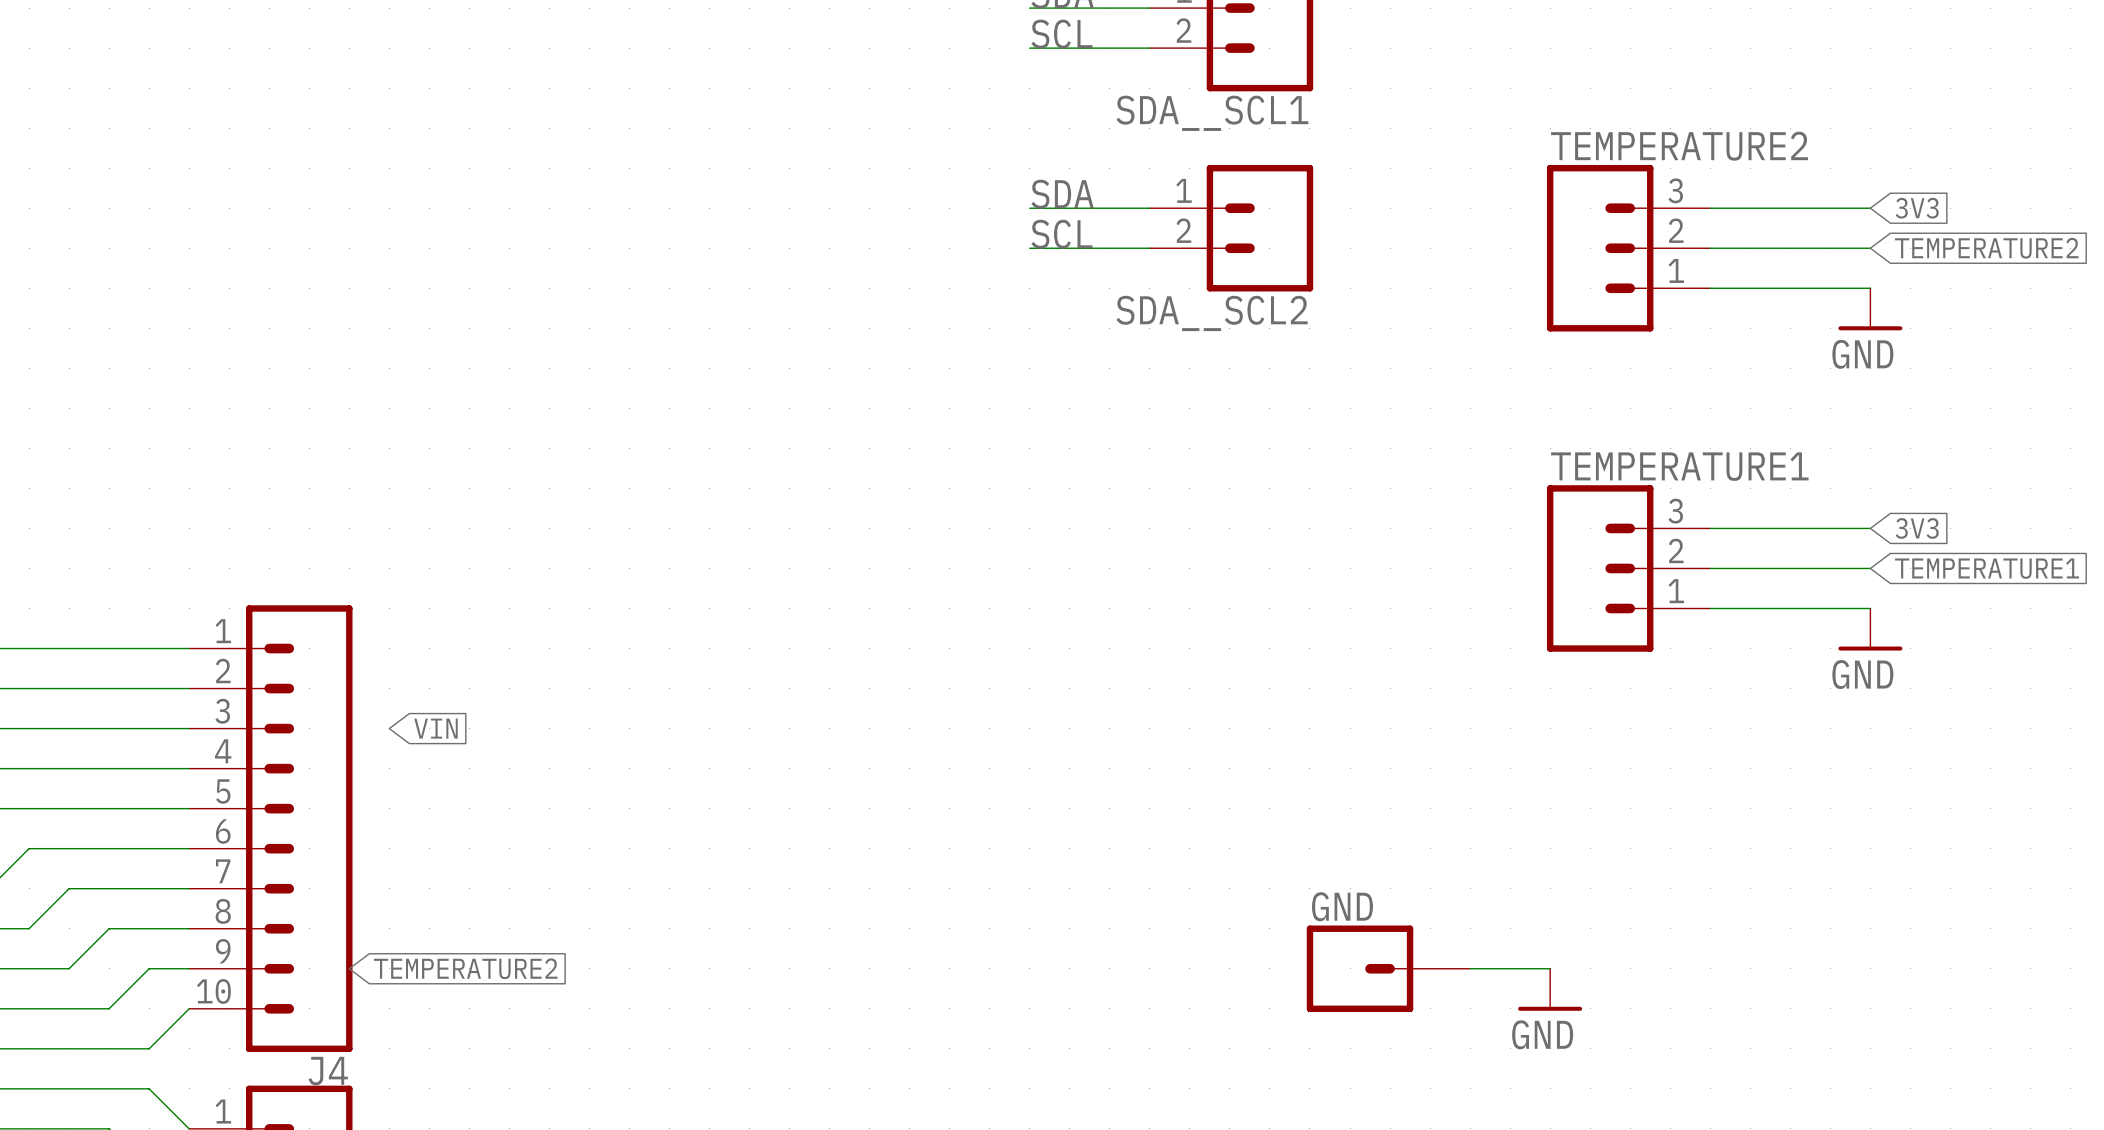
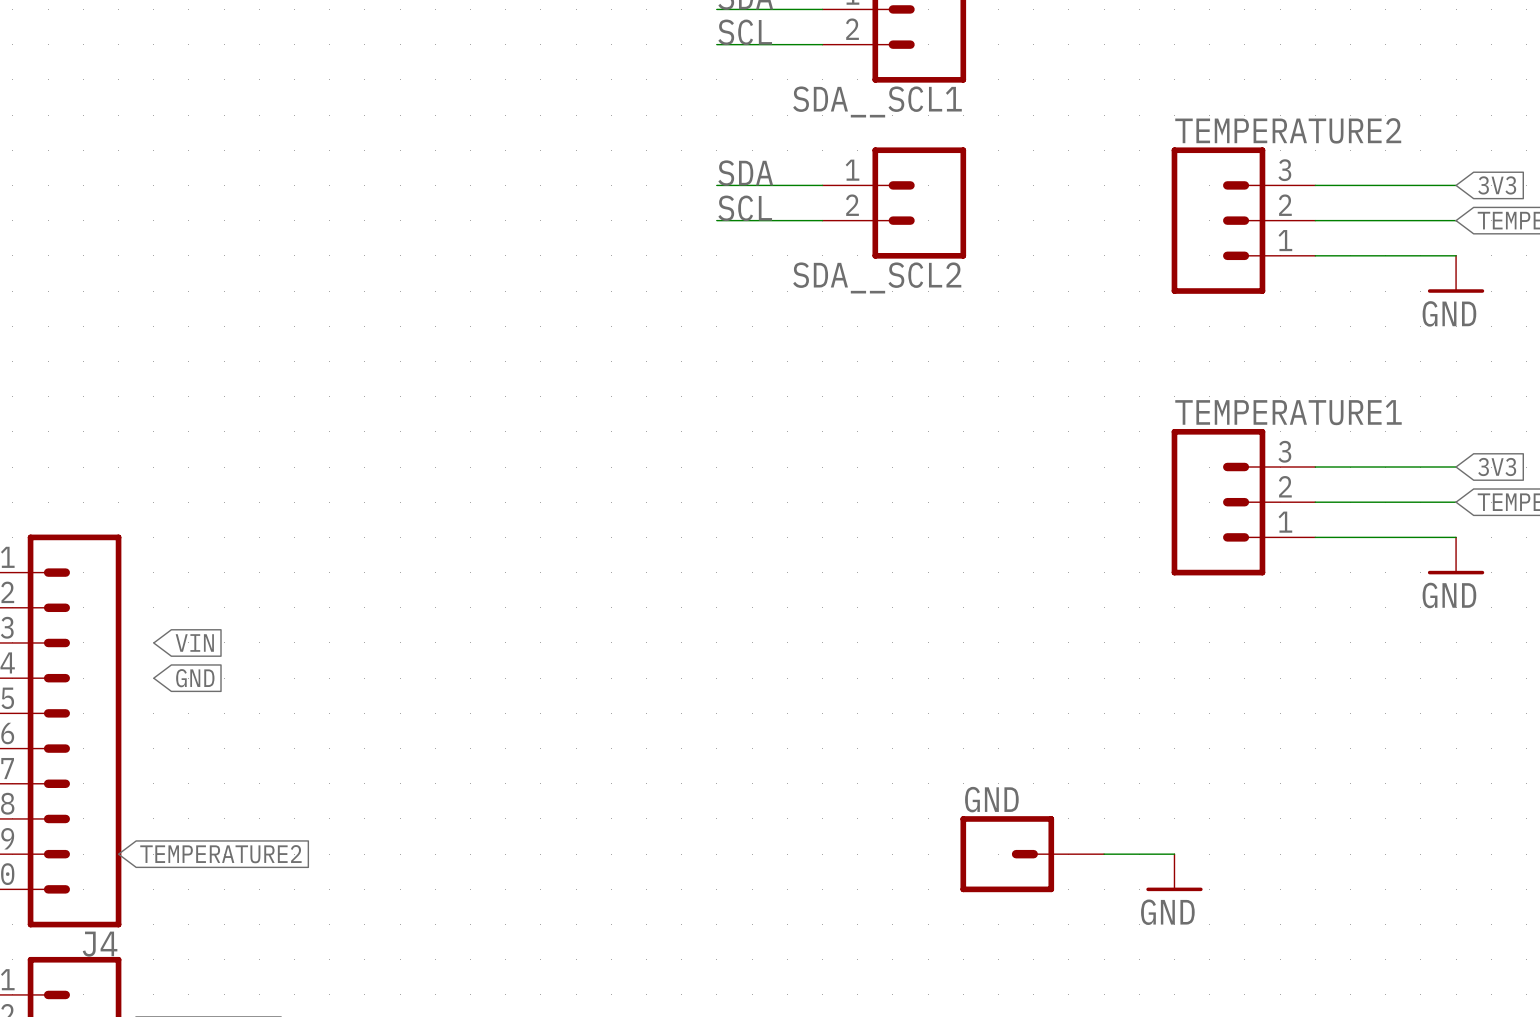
global label: none -> GND (195, 678)

